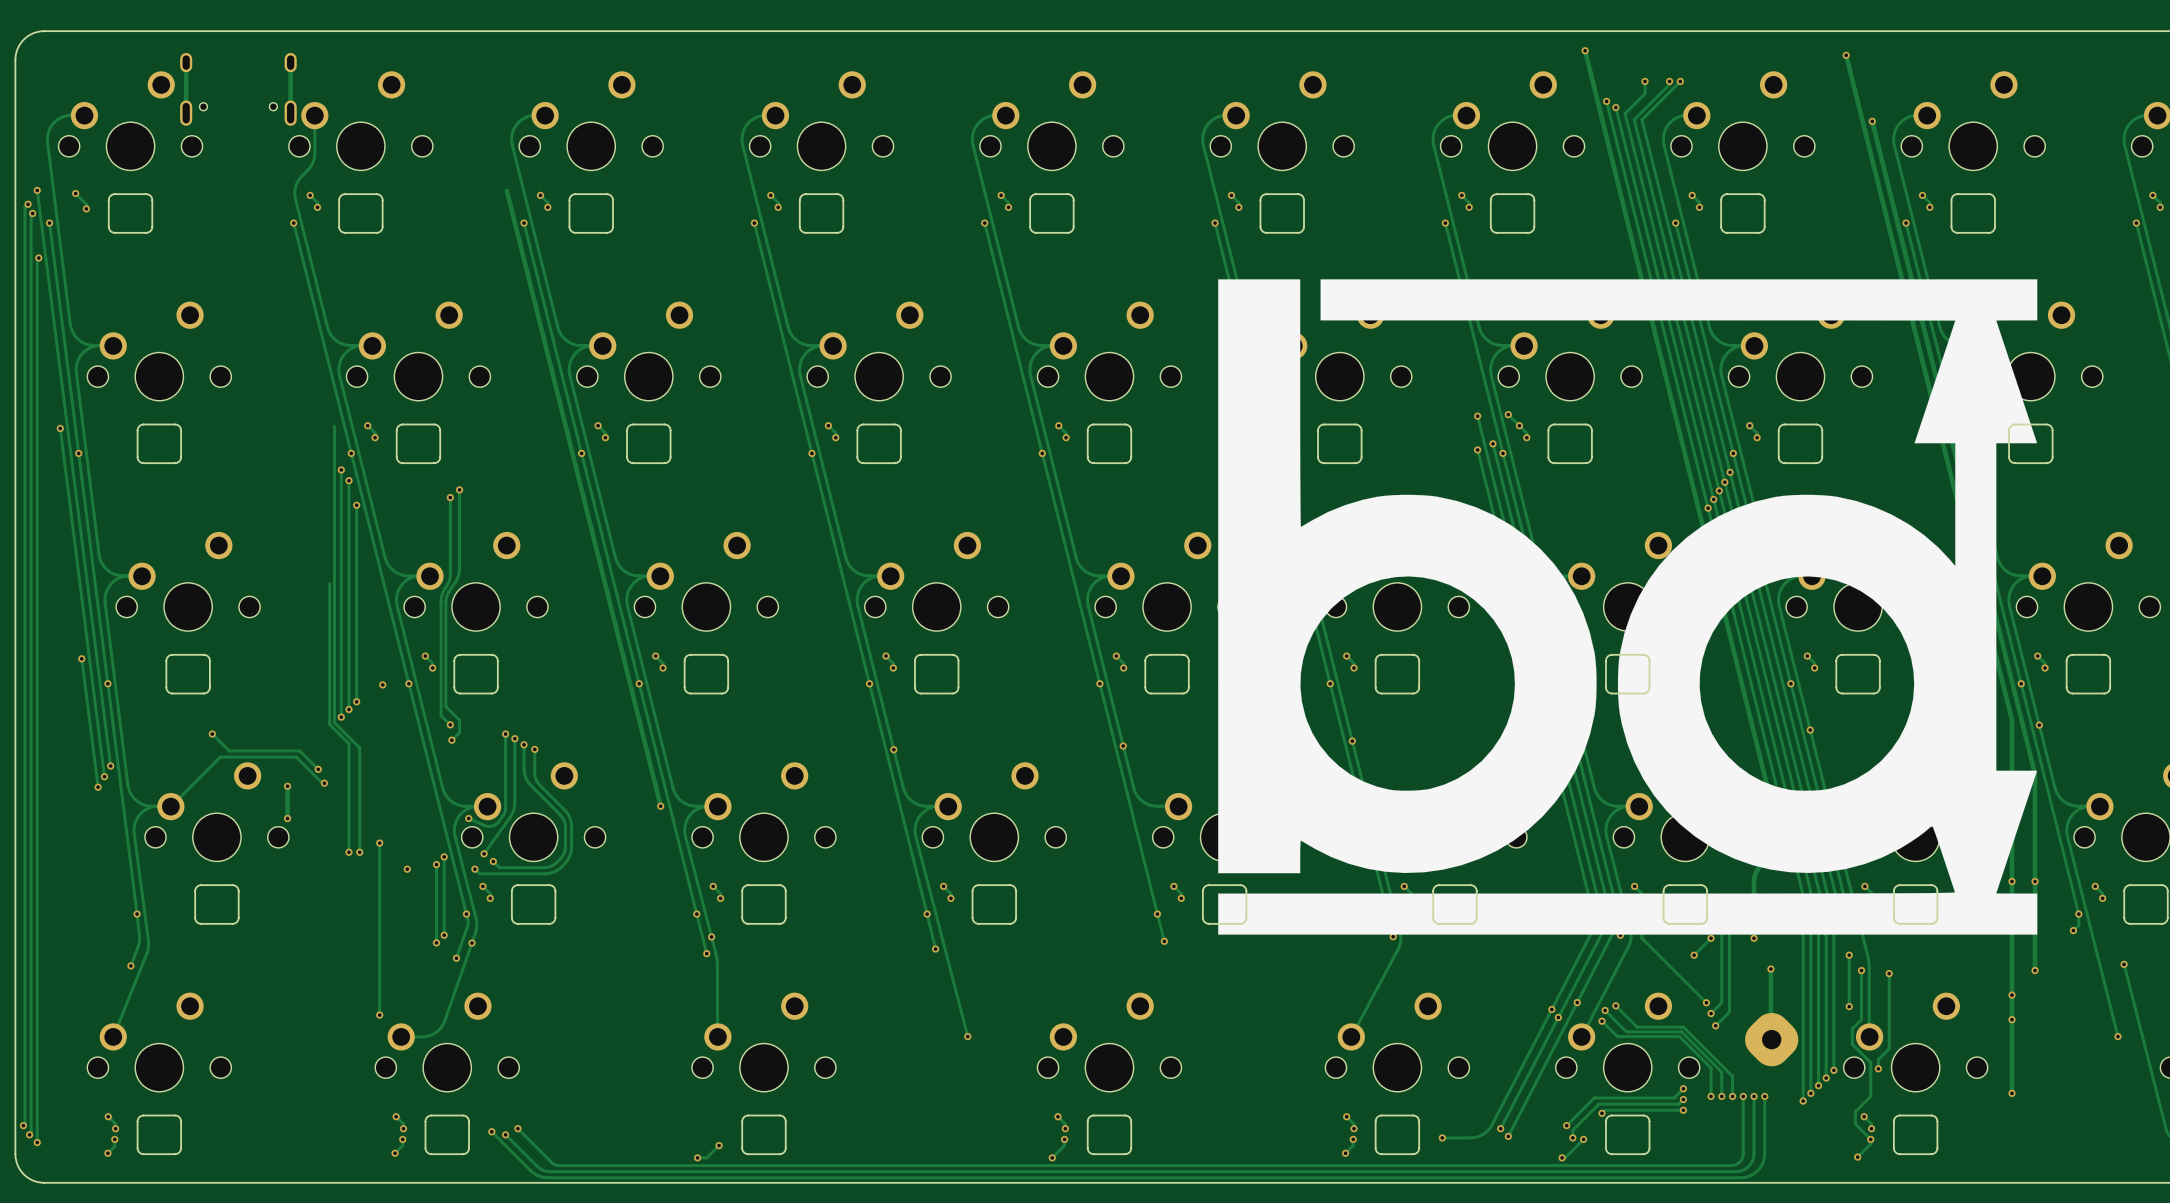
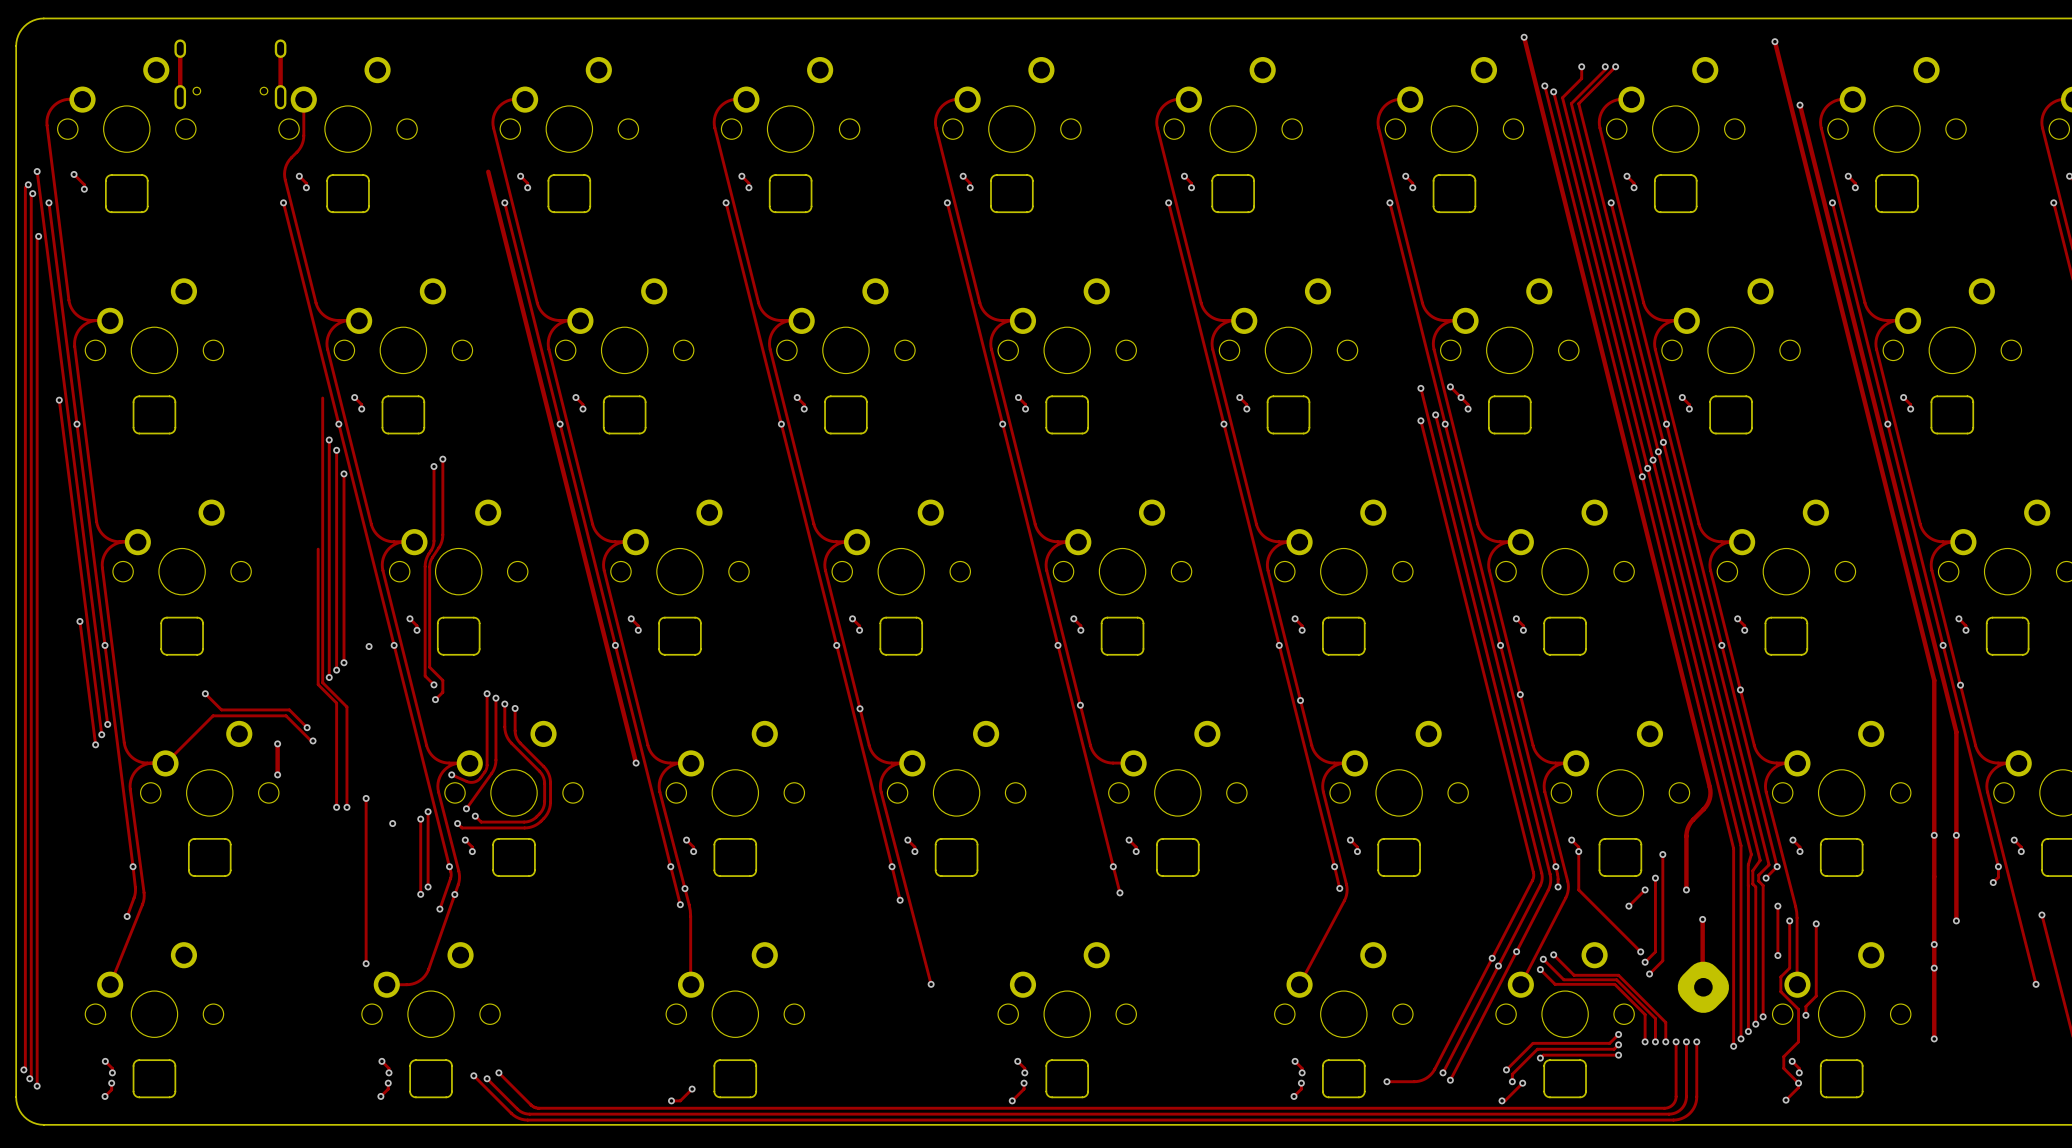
drawing: [1218, 279, 2038, 935] -> none

